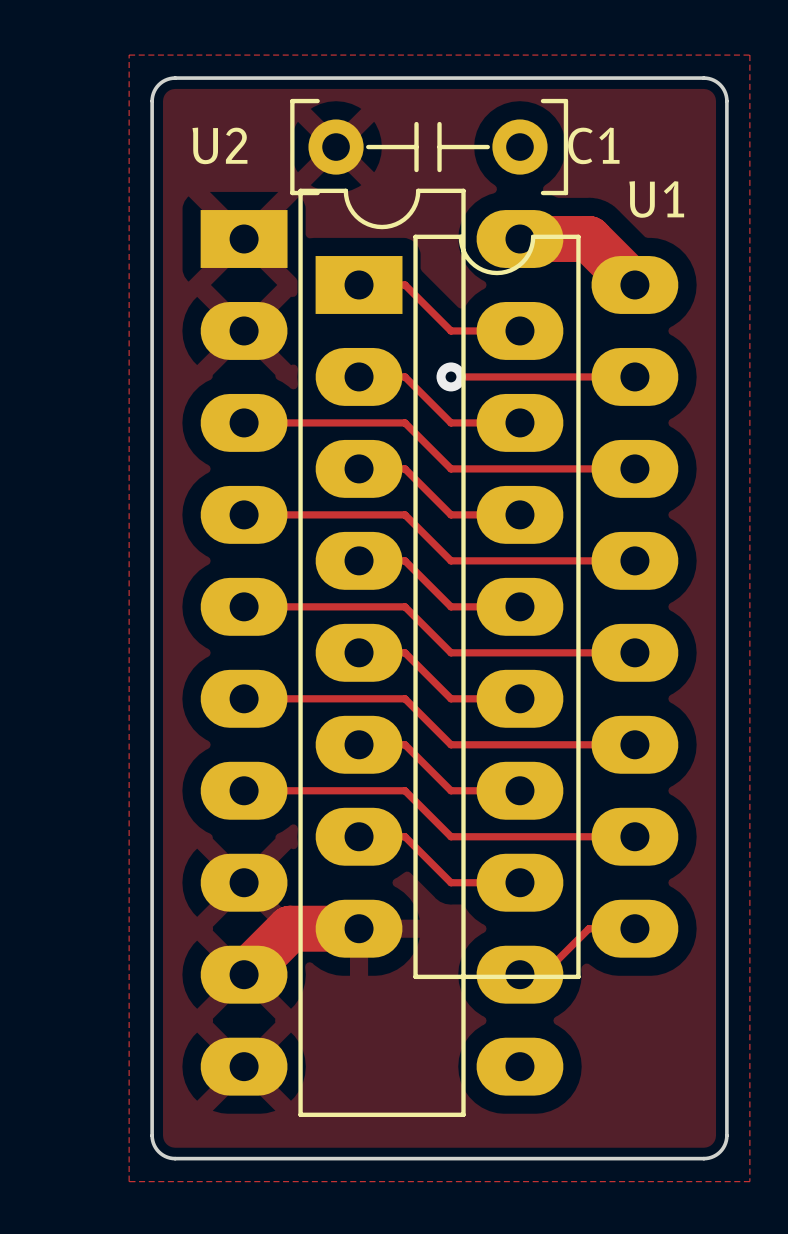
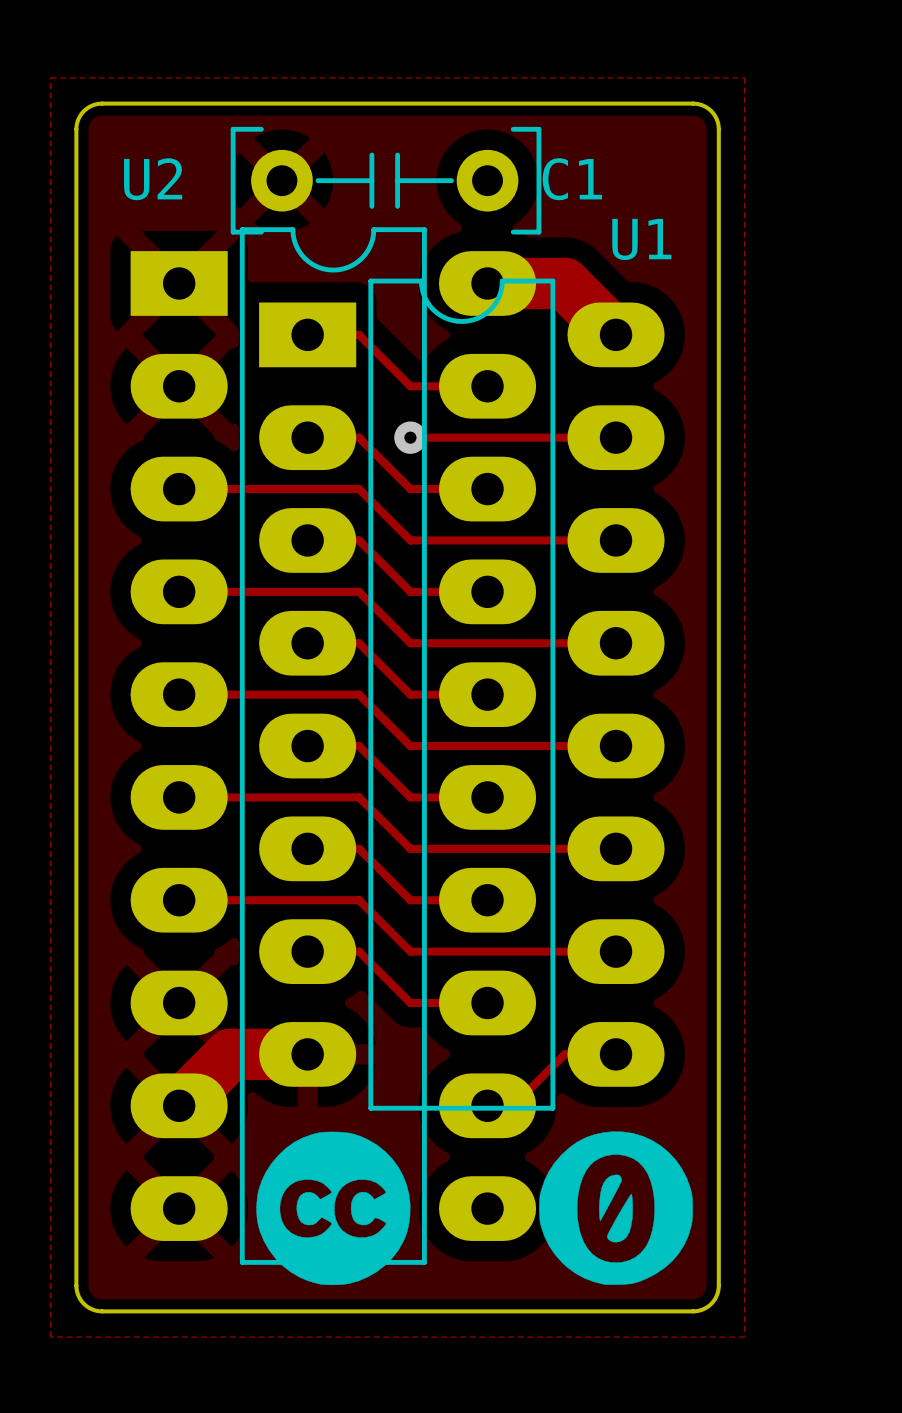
drawing: none -> [256, 1131, 411, 1286]
drawing: none -> [539, 1131, 693, 1285]

